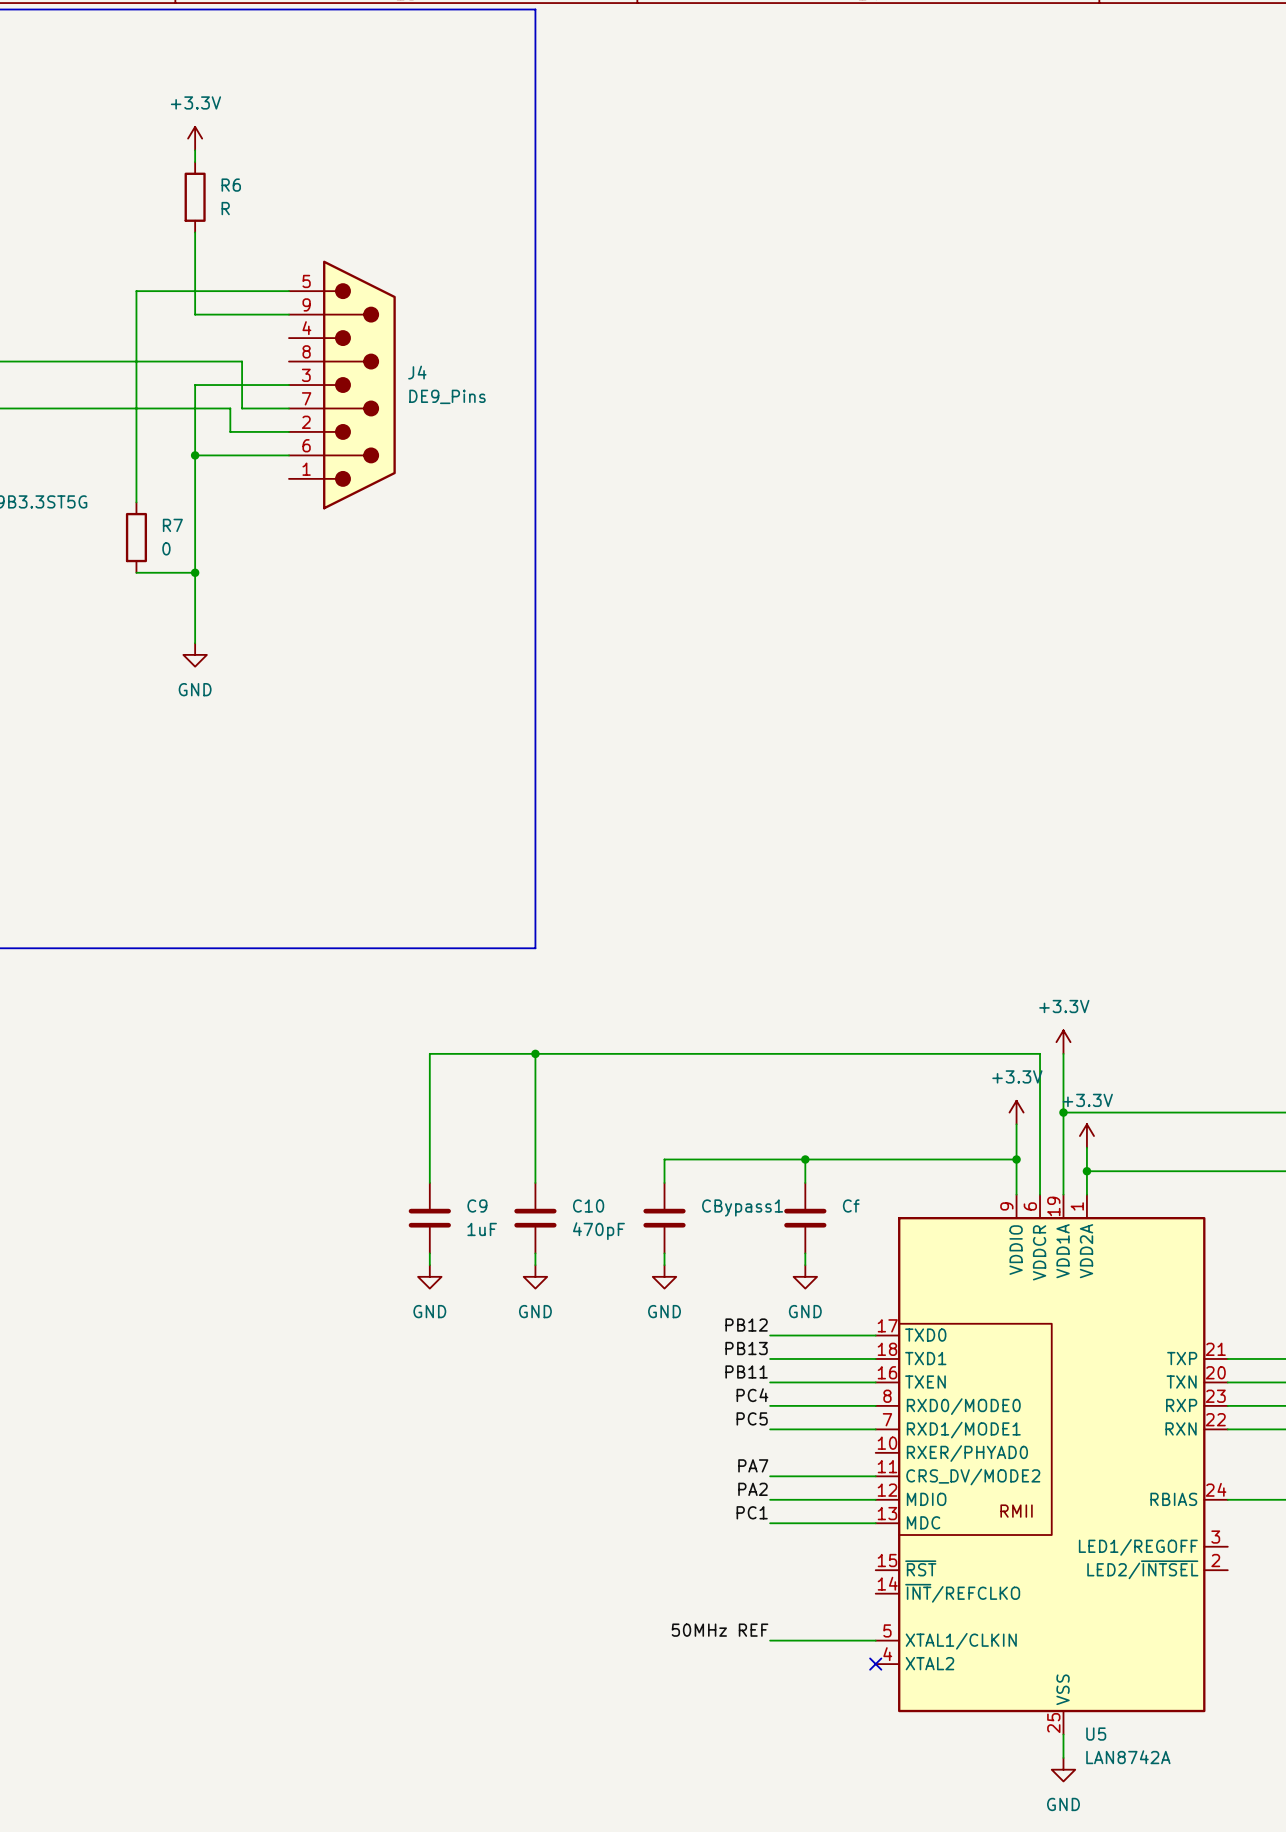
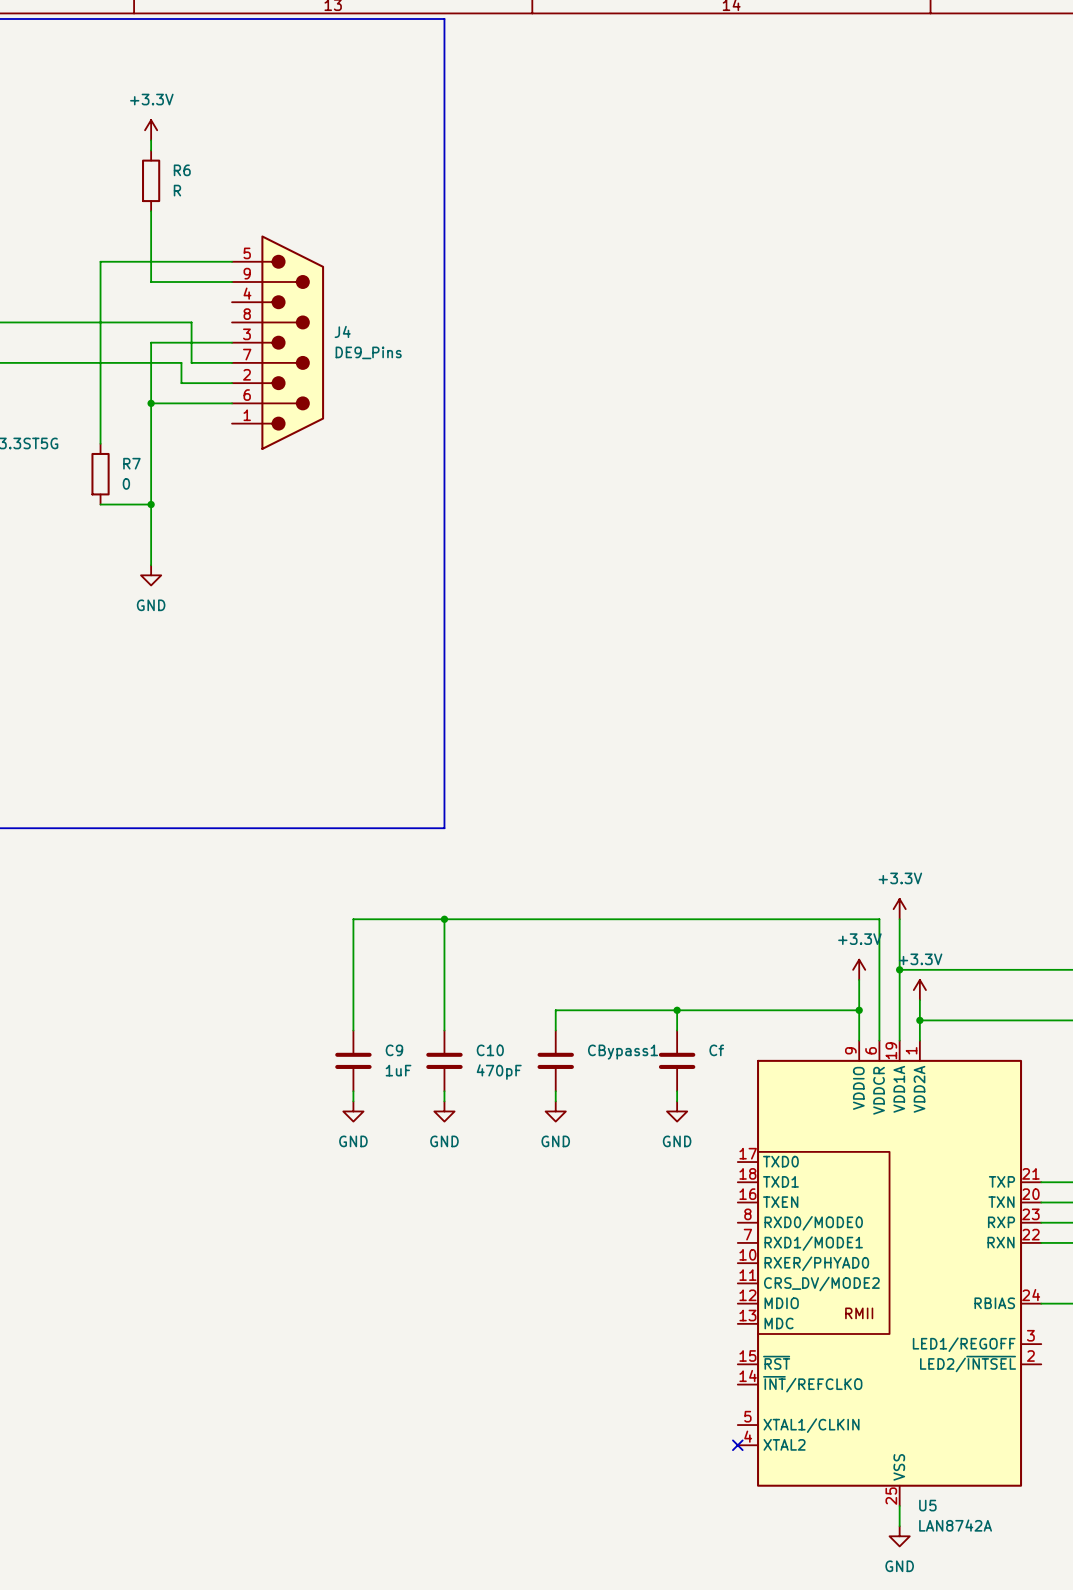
label: PB12 (746, 1325) -> none
wire: (770, 1335) (875, 1335) -> none
label: PB13 (746, 1348) -> none
wire: (770, 1358) (875, 1358) -> none
label: PB11 (746, 1371) -> none
wire: (770, 1382) (875, 1382) -> none
label: PC4 (752, 1395) -> none
wire: (770, 1405) (875, 1405) -> none
label: PC5 (752, 1418) -> none
wire: (770, 1429) (875, 1429) -> none
label: PA7 (753, 1465) -> none
wire: (770, 1476) (875, 1476) -> none
label: PA2 (752, 1489) -> none
wire: (770, 1499) (875, 1499) -> none
label: PC1 (752, 1512) -> none
wire: (770, 1523) (875, 1523) -> none
label: 50MHz REF (720, 1630) -> none
wire: (770, 1640) (875, 1640) -> none

